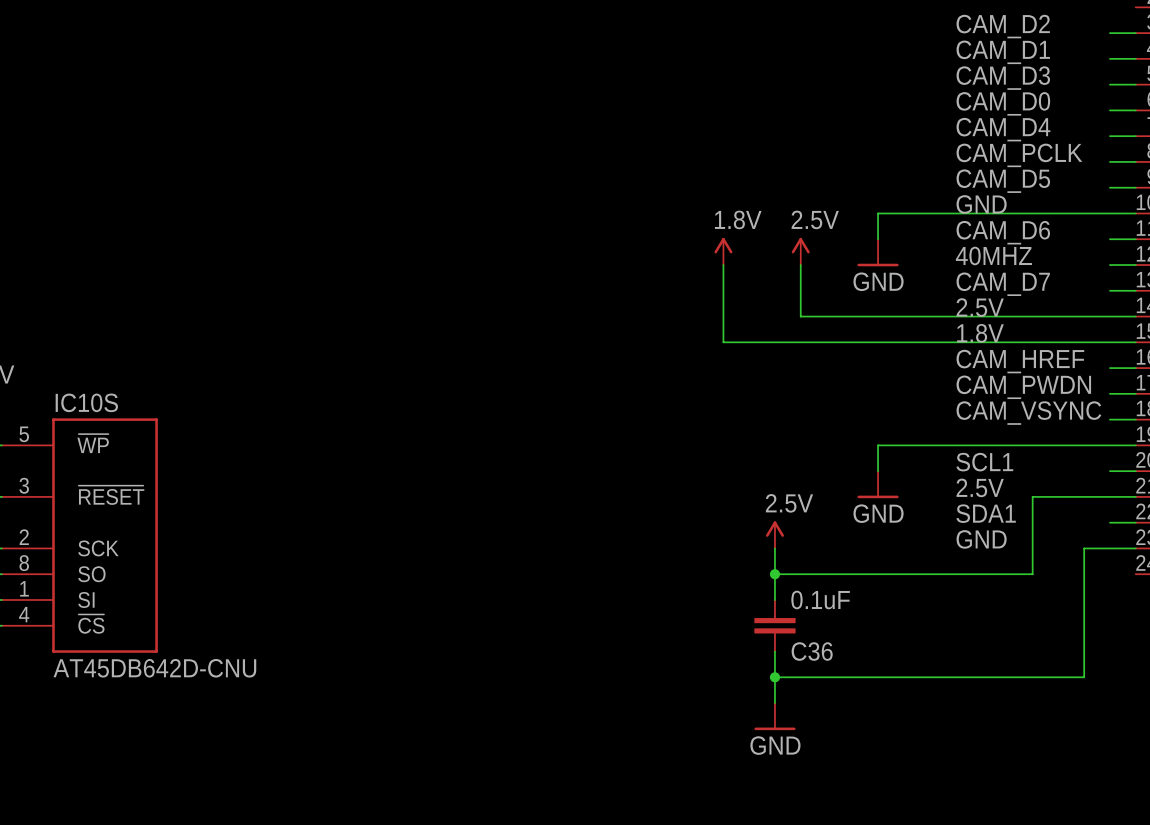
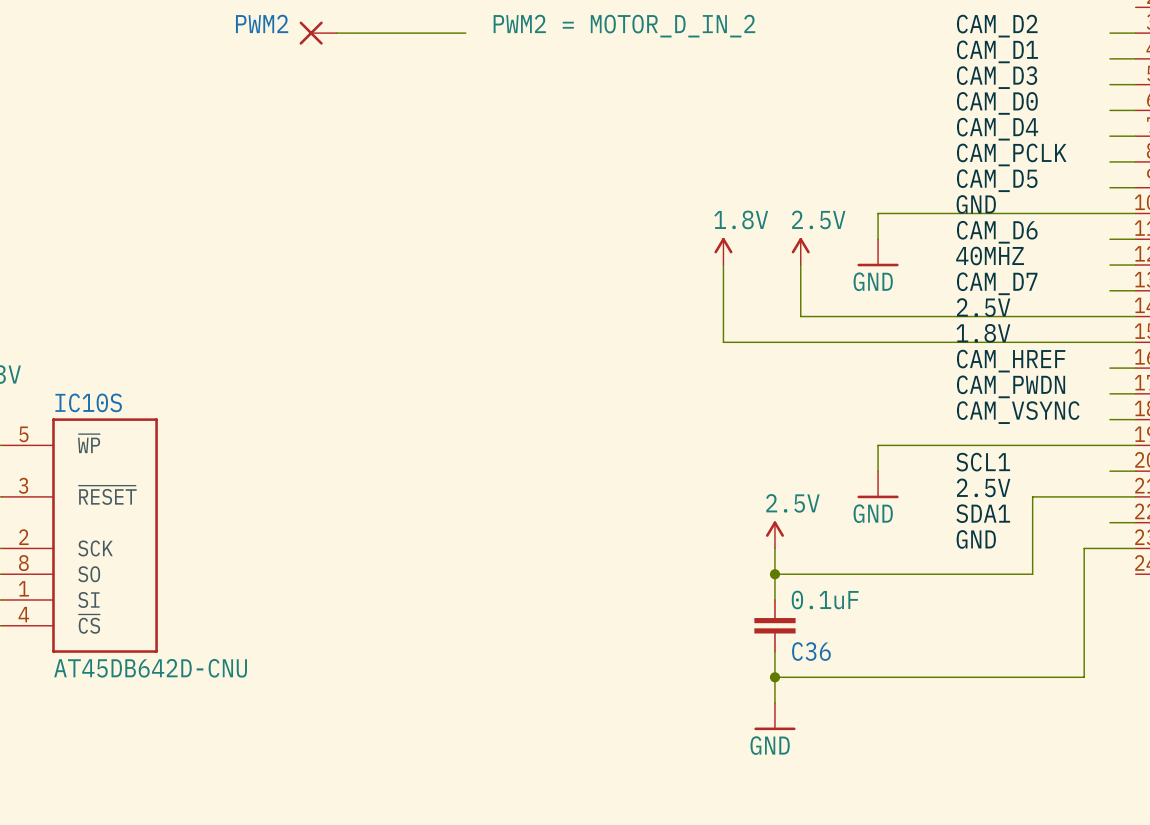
PWM2: none -> (318, 33)
wire: none -> (336, 33) (465, 33)

